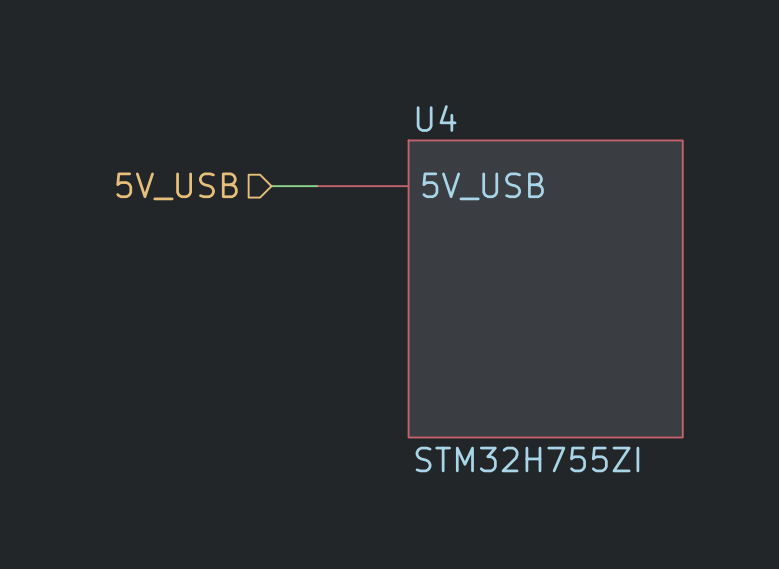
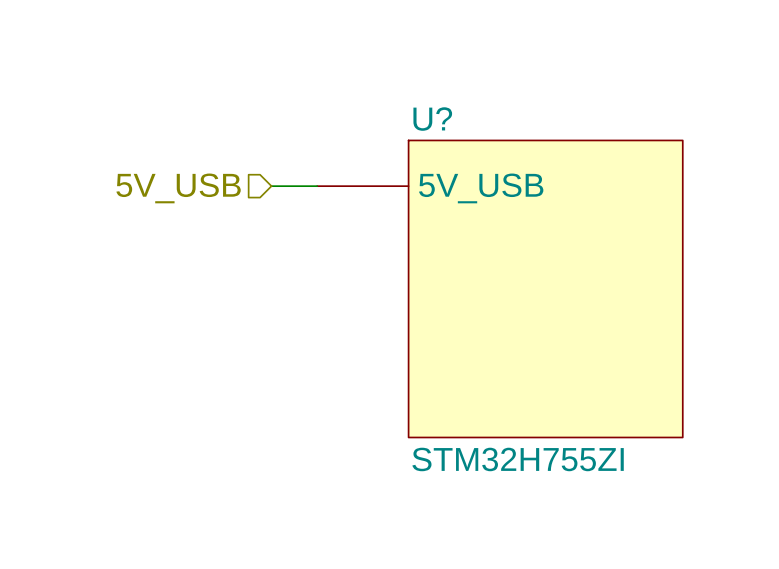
U4 name: U4 (436, 118) -> U? (432, 119)

